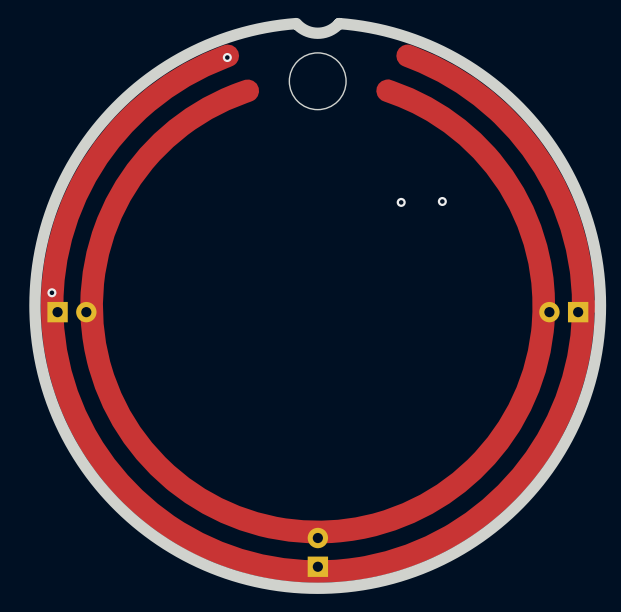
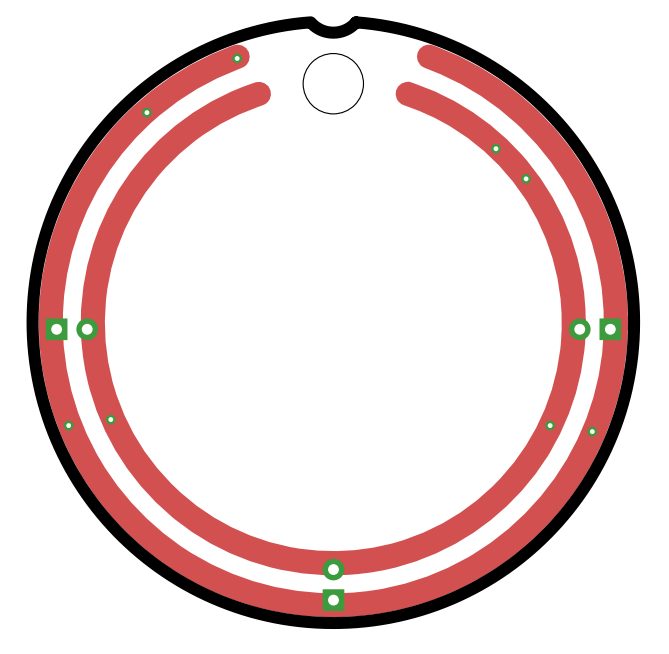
via: none -> (146, 112)
via: none -> (495, 148)
via: none -> (526, 178)
via: (442, 201) -> none
via: (401, 202) -> none
via: (51, 292) -> none
via: none -> (110, 419)
via: none -> (68, 425)
via: none -> (550, 425)
via: none -> (592, 431)

